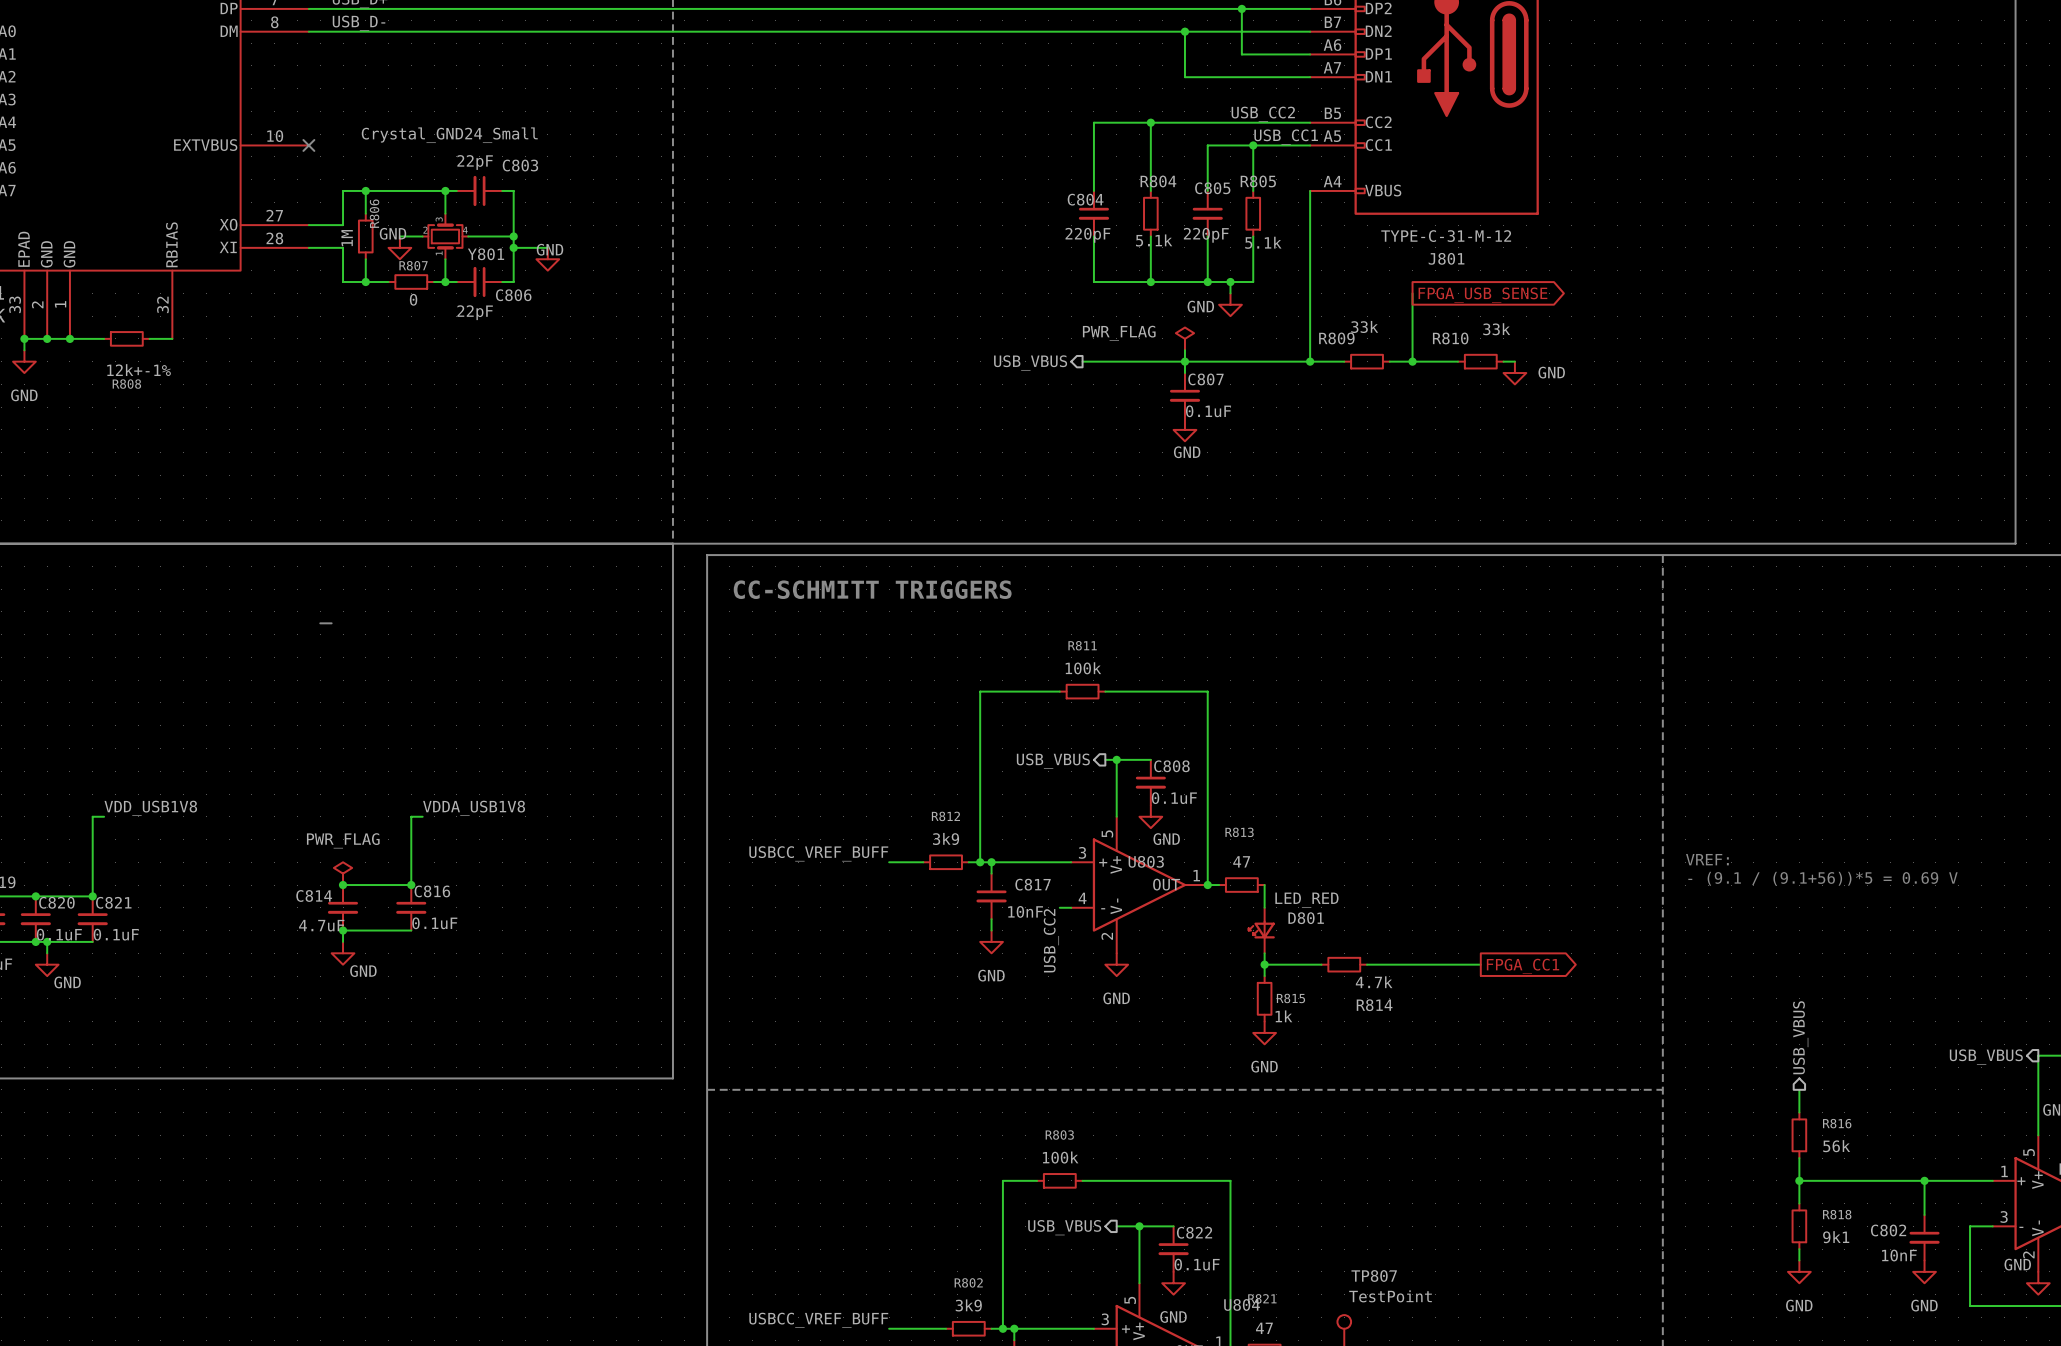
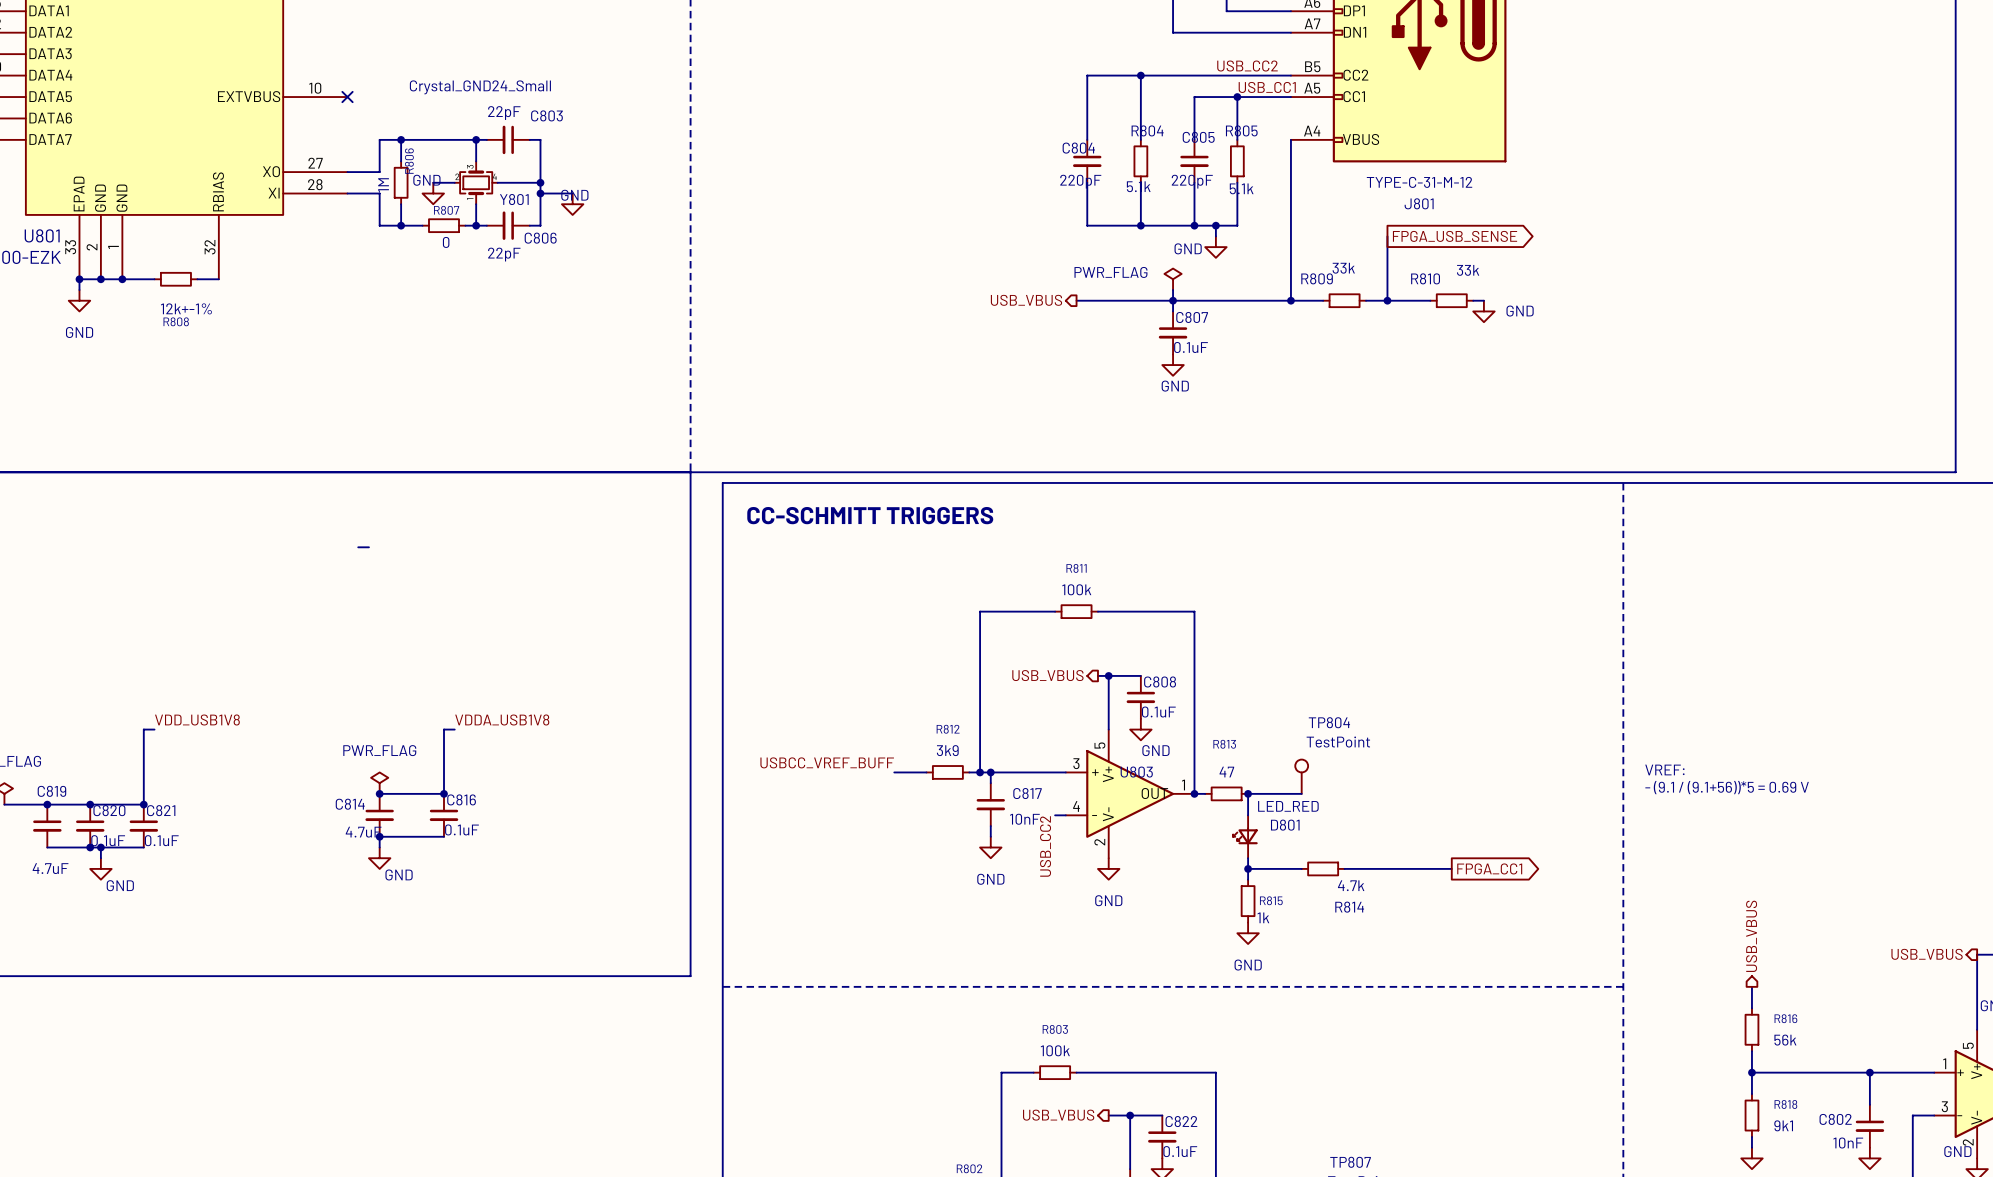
TP804: none -> TestPoint (1301, 776)
wire: none -> (1248, 793) (1301, 793)
junction: none -> (1248, 793)

